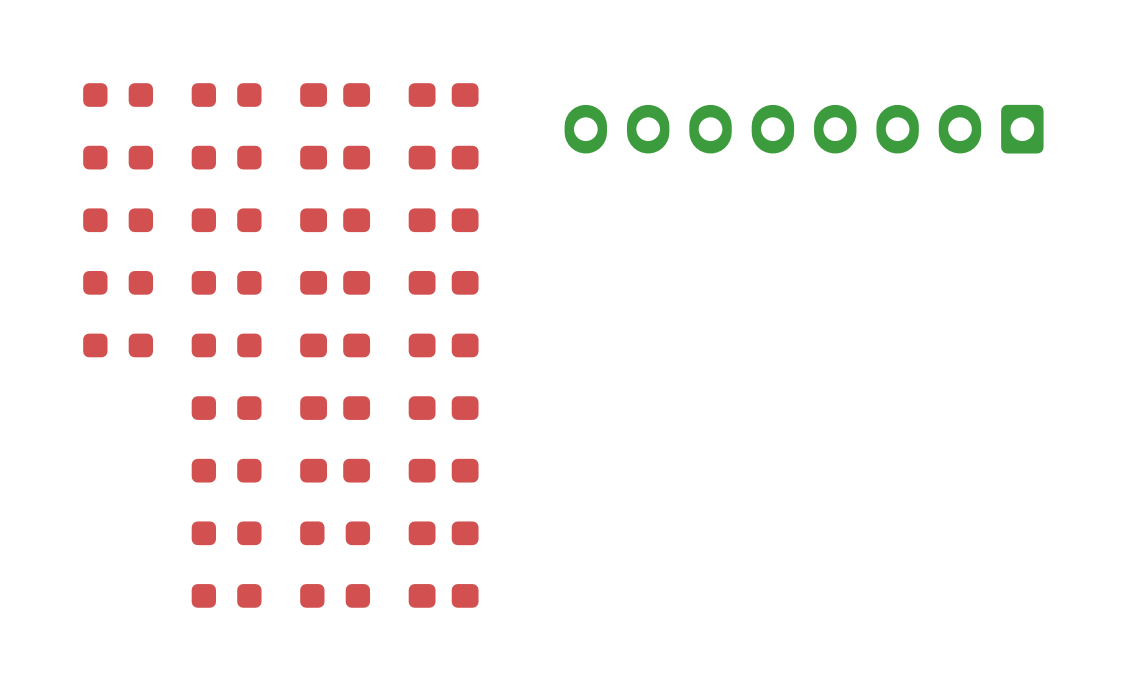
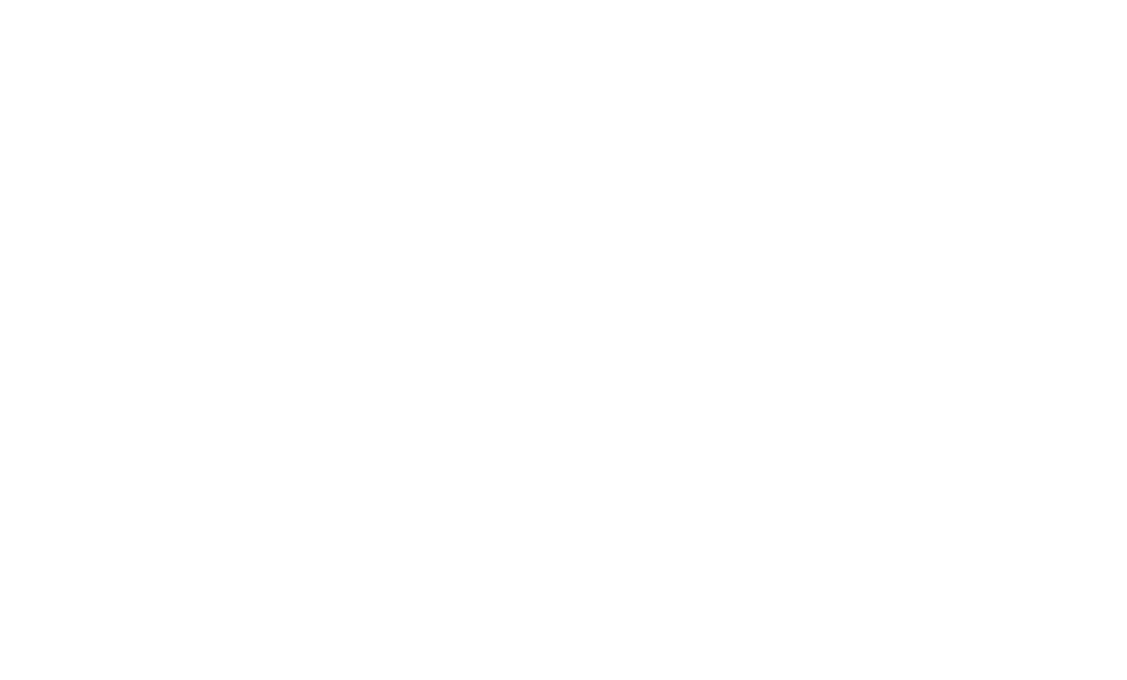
part: (118, 95) -> none
part: (226, 95) -> none
part: (335, 95) -> none
part: (443, 95) -> none
part: (804, 129) -> none
part: (118, 157) -> none
part: (226, 157) -> none
part: (335, 157) -> none
part: (443, 157) -> none
part: (118, 220) -> none
part: (226, 220) -> none
part: (335, 220) -> none
part: (443, 220) -> none
part: (118, 282) -> none
part: (226, 282) -> none
part: (335, 282) -> none
part: (443, 282) -> none
part: (118, 345) -> none
part: (226, 345) -> none
part: (335, 345) -> none
part: (443, 345) -> none
part: (226, 408) -> none
part: (335, 408) -> none
part: (443, 408) -> none
part: (226, 470) -> none
part: (335, 470) -> none
part: (443, 470) -> none
part: (226, 533) -> none
part: (335, 533) -> none
part: (443, 533) -> none
part: (226, 595) -> none
part: (335, 595) -> none
part: (443, 595) -> none

